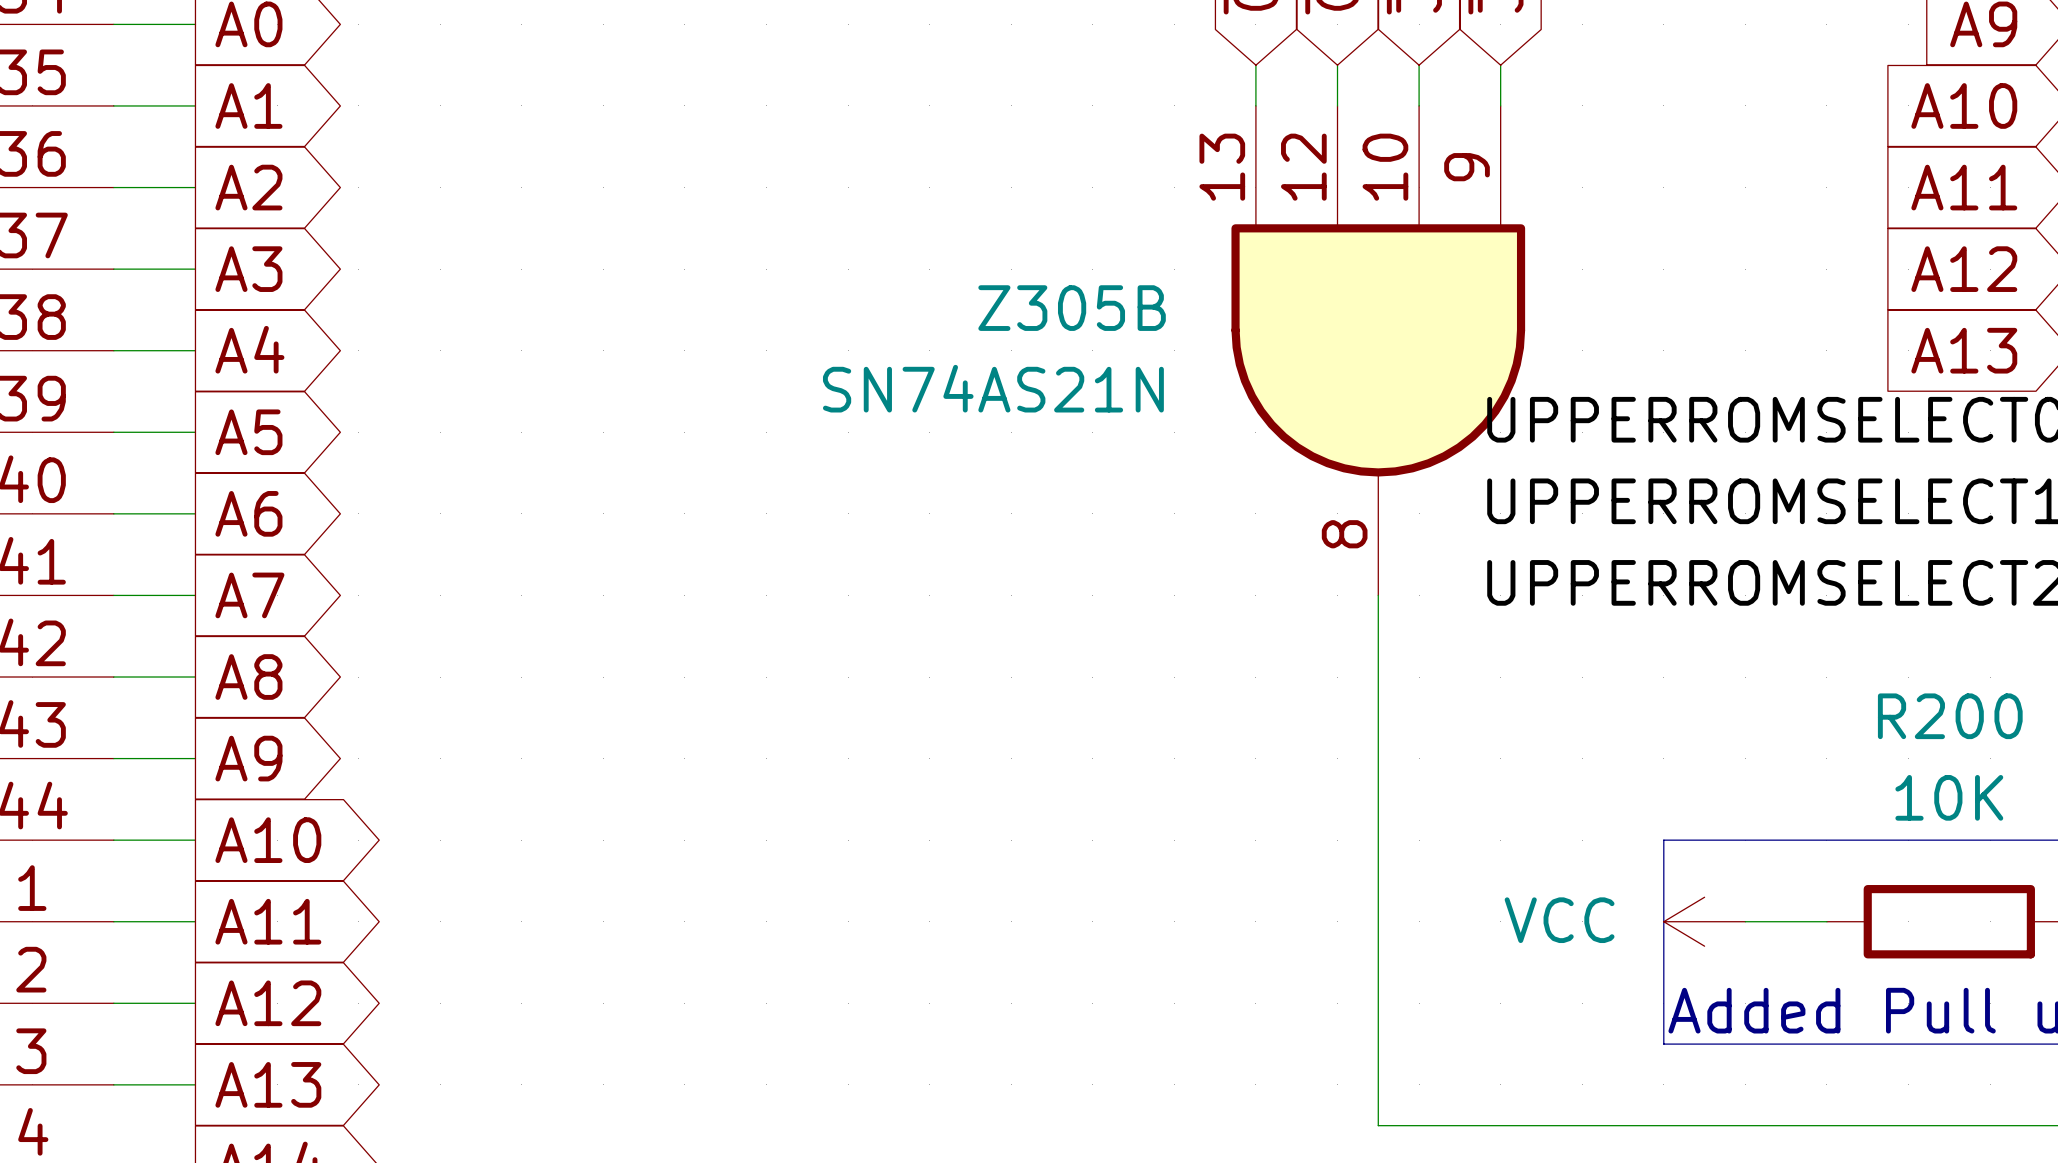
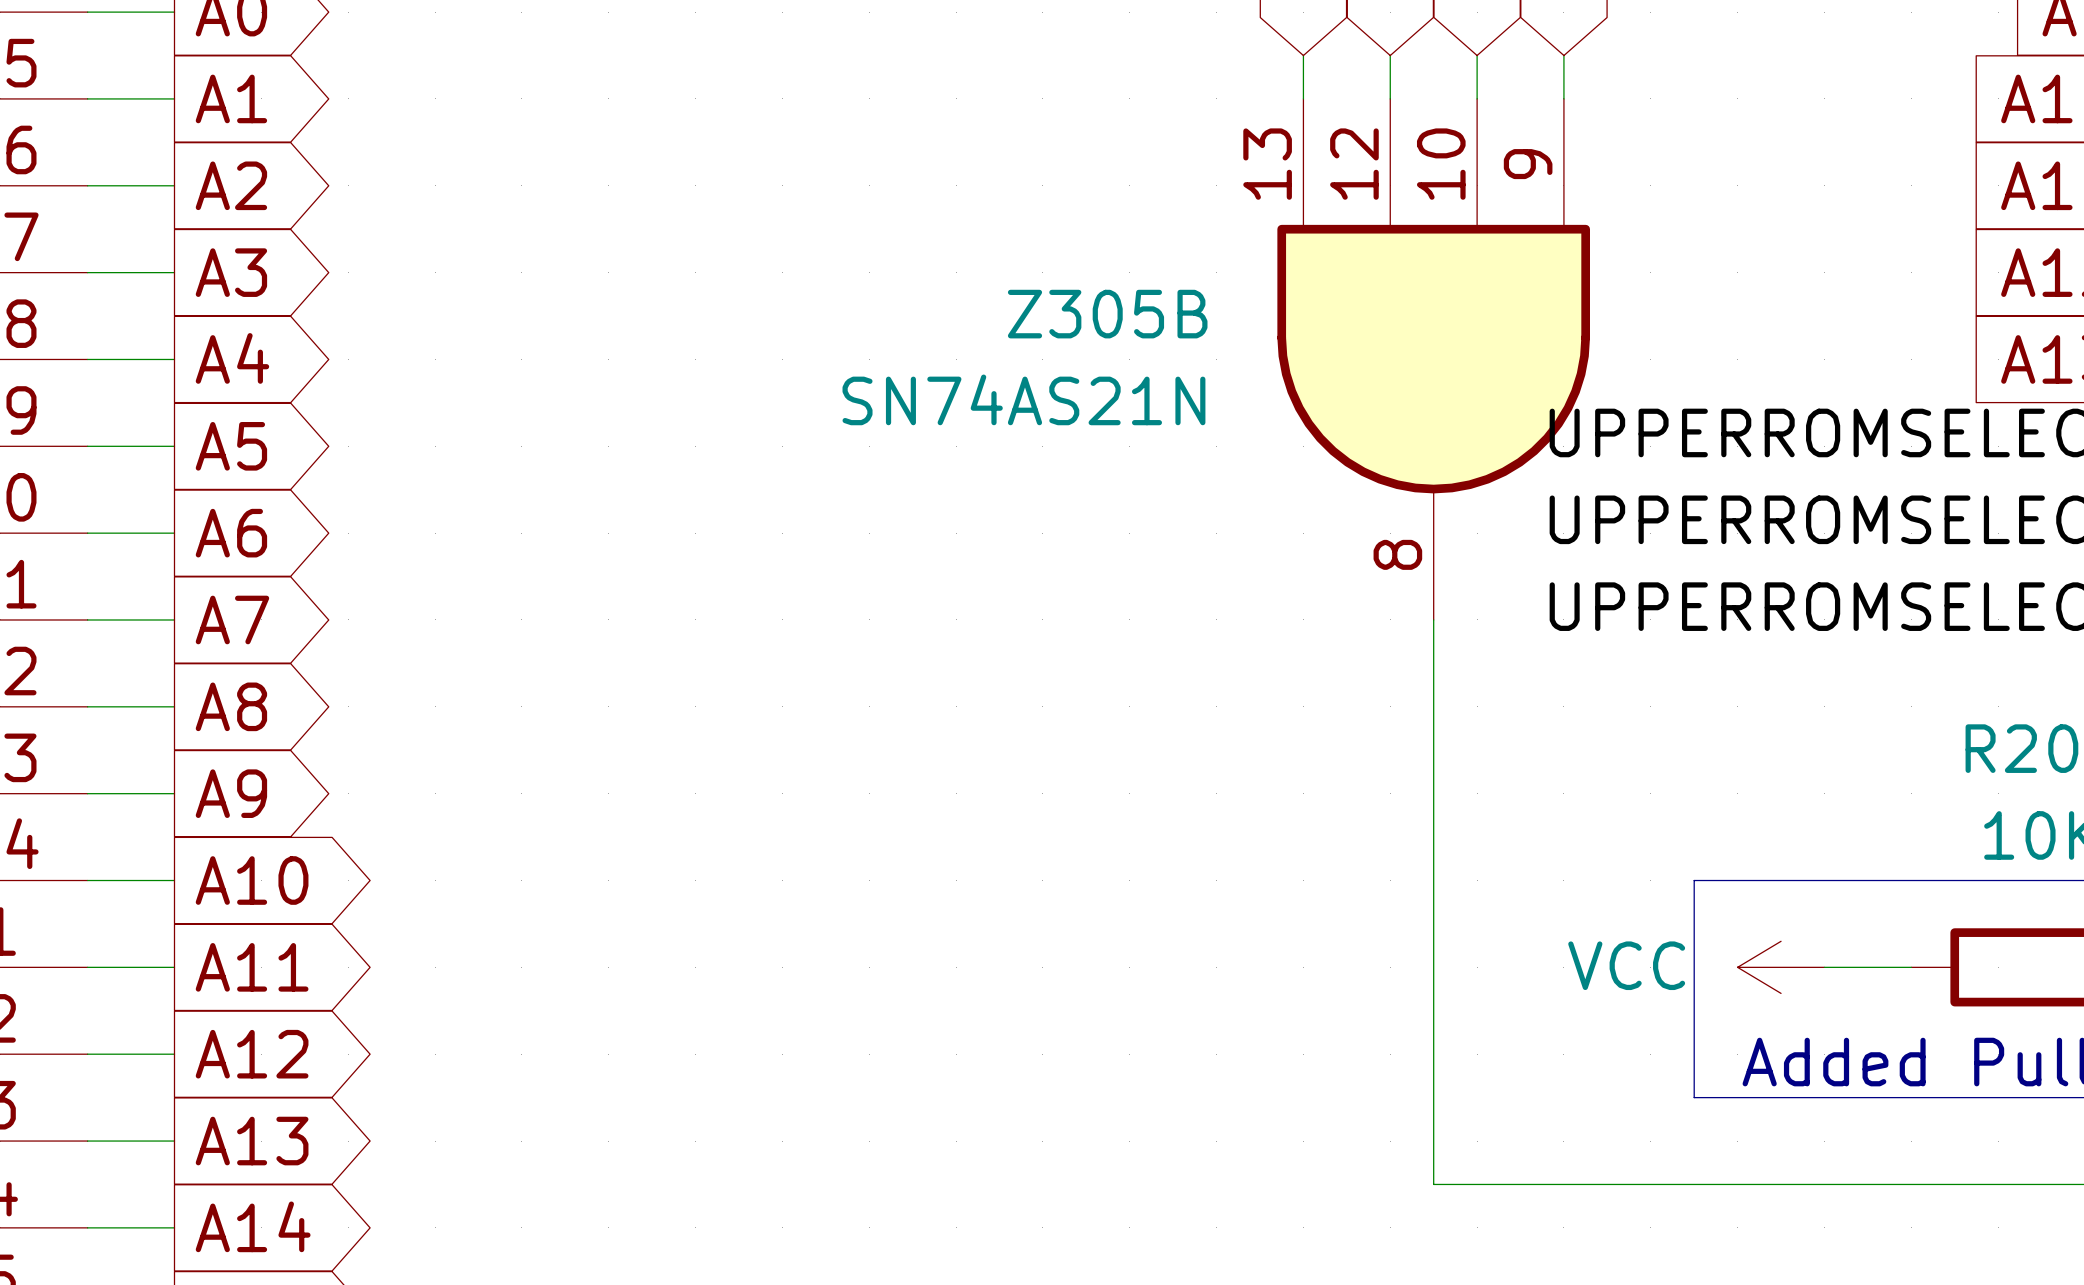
line: (1663, 840) (1663, 1044) -> (1737, 880) (1694, 880) (1694, 1097) (1737, 1097)

